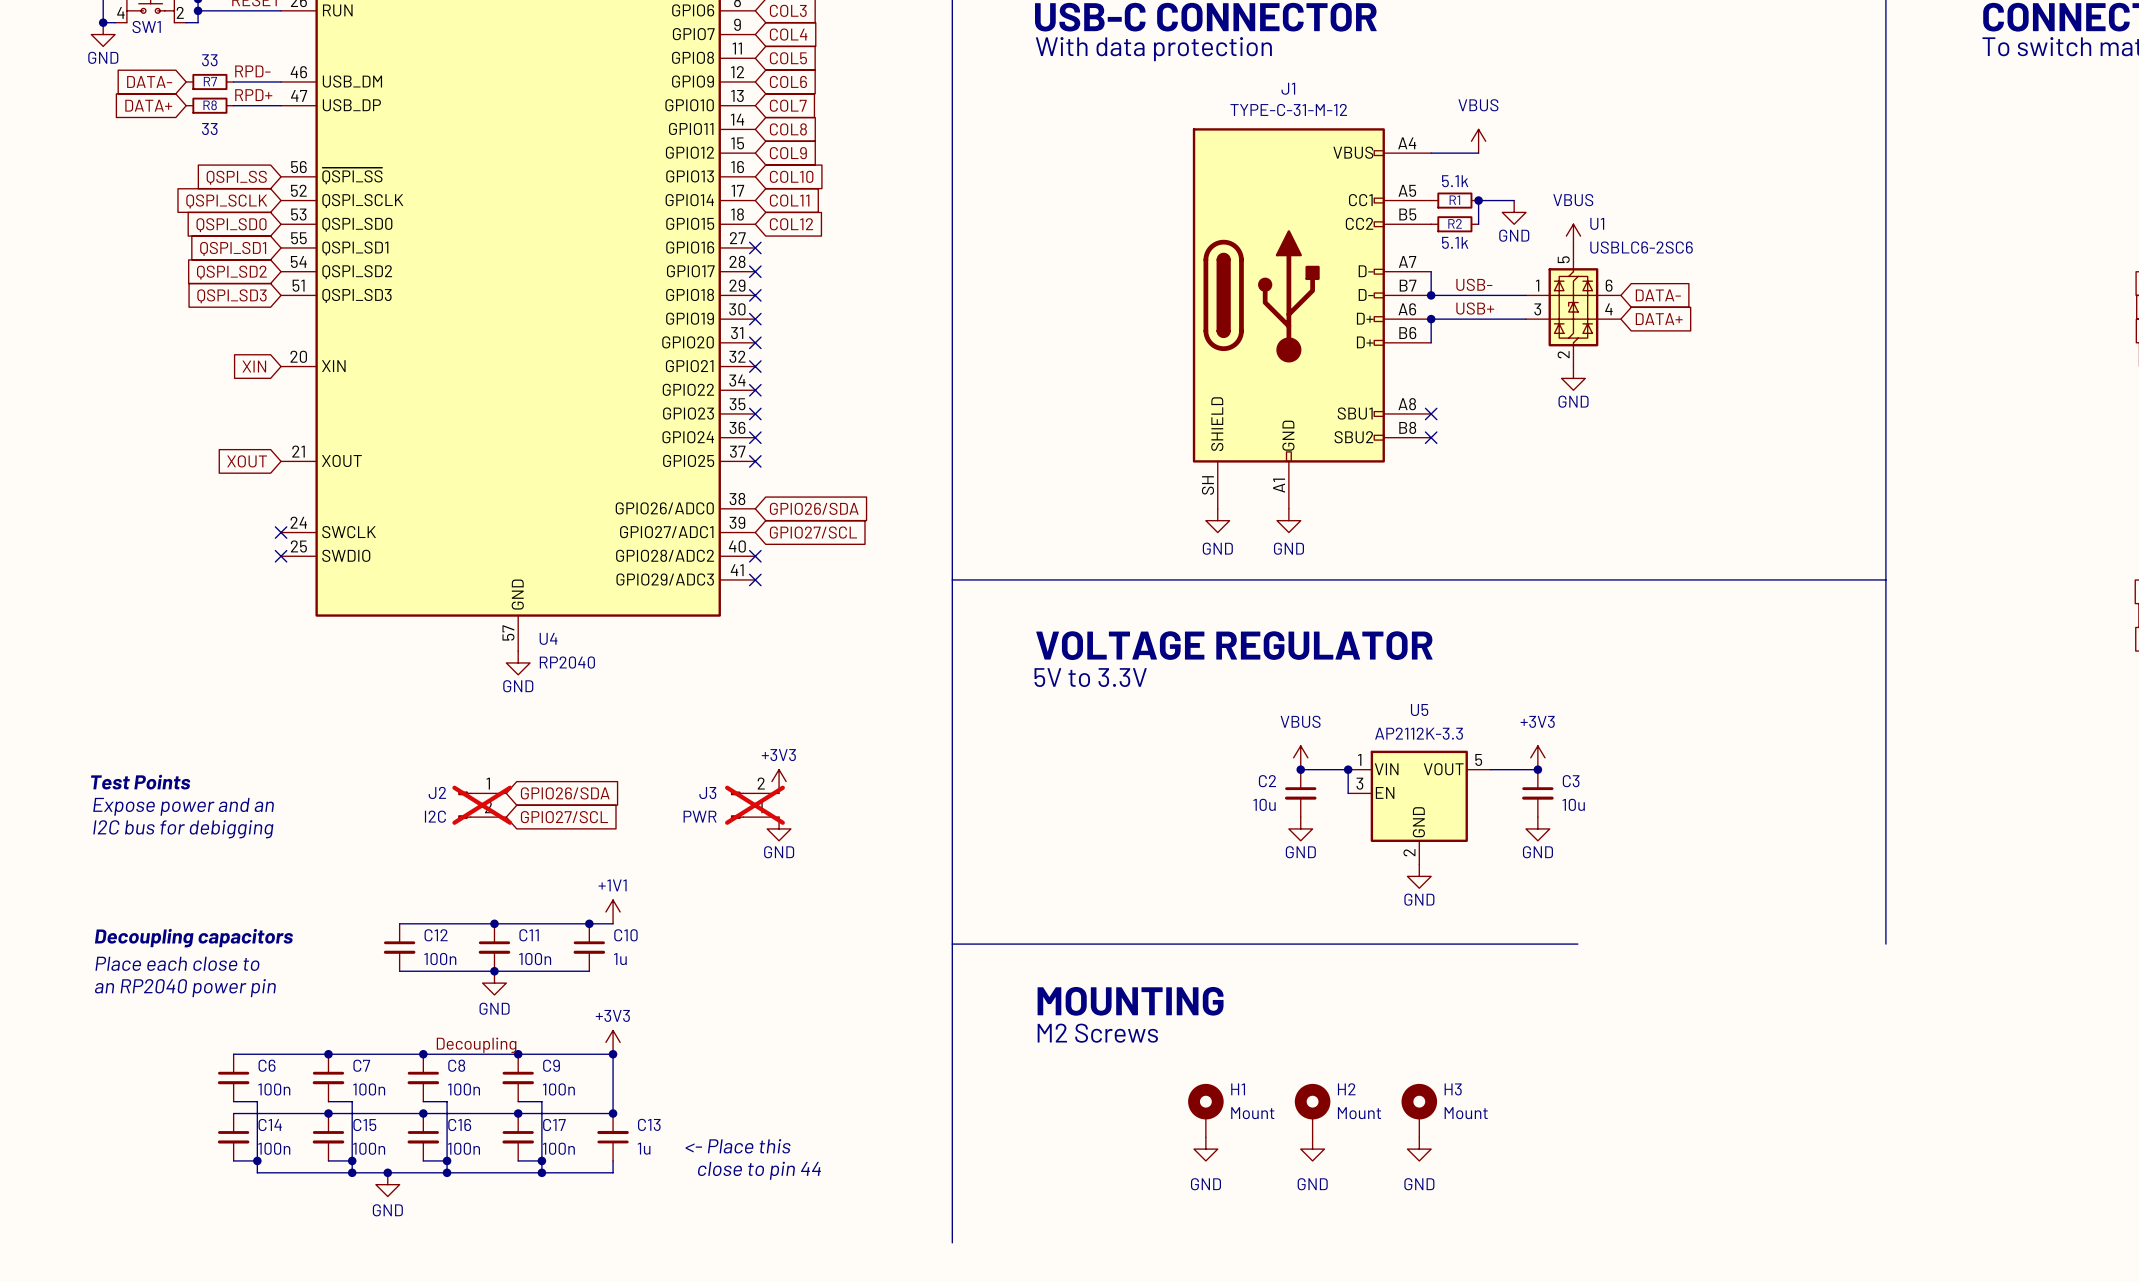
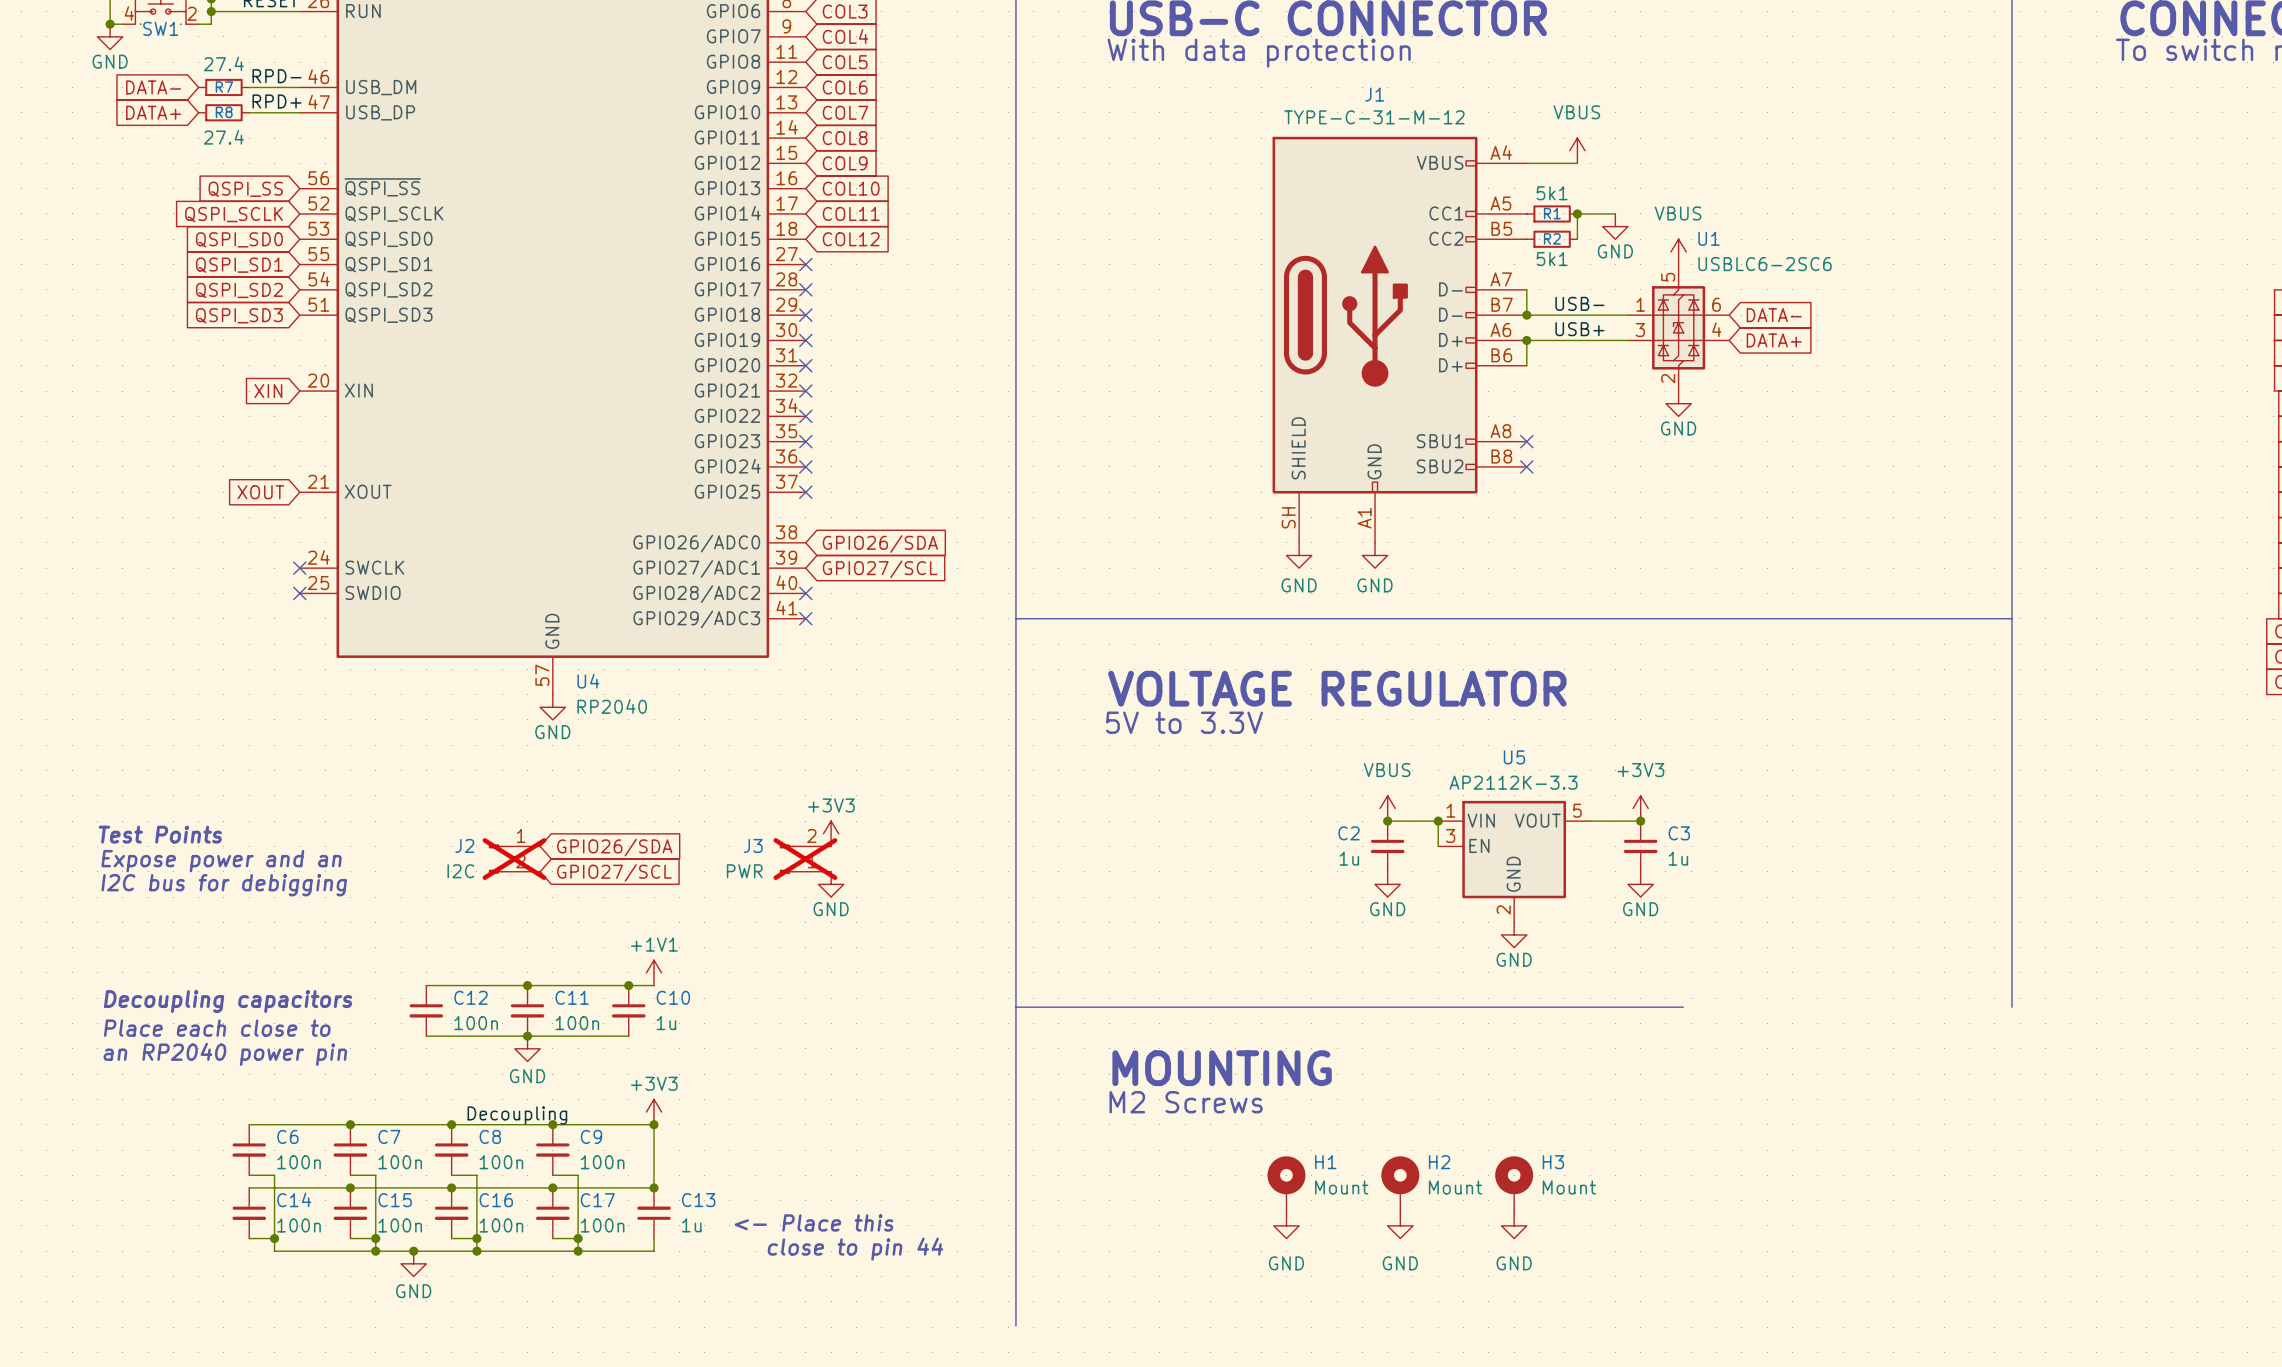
R7 value: 33 (209, 60) -> 27.4 (223, 63)
R8 value: 33 (209, 129) -> 27.4 (223, 137)
R1 value: 5.1k (1455, 181) -> 5k1 (1552, 193)
R2 value: 5.1k (1455, 242) -> 5k1 (1552, 259)
C2 value: 10u (1264, 804) -> 1u (1349, 858)
C3 value: 10u (1573, 804) -> 1u (1678, 858)

